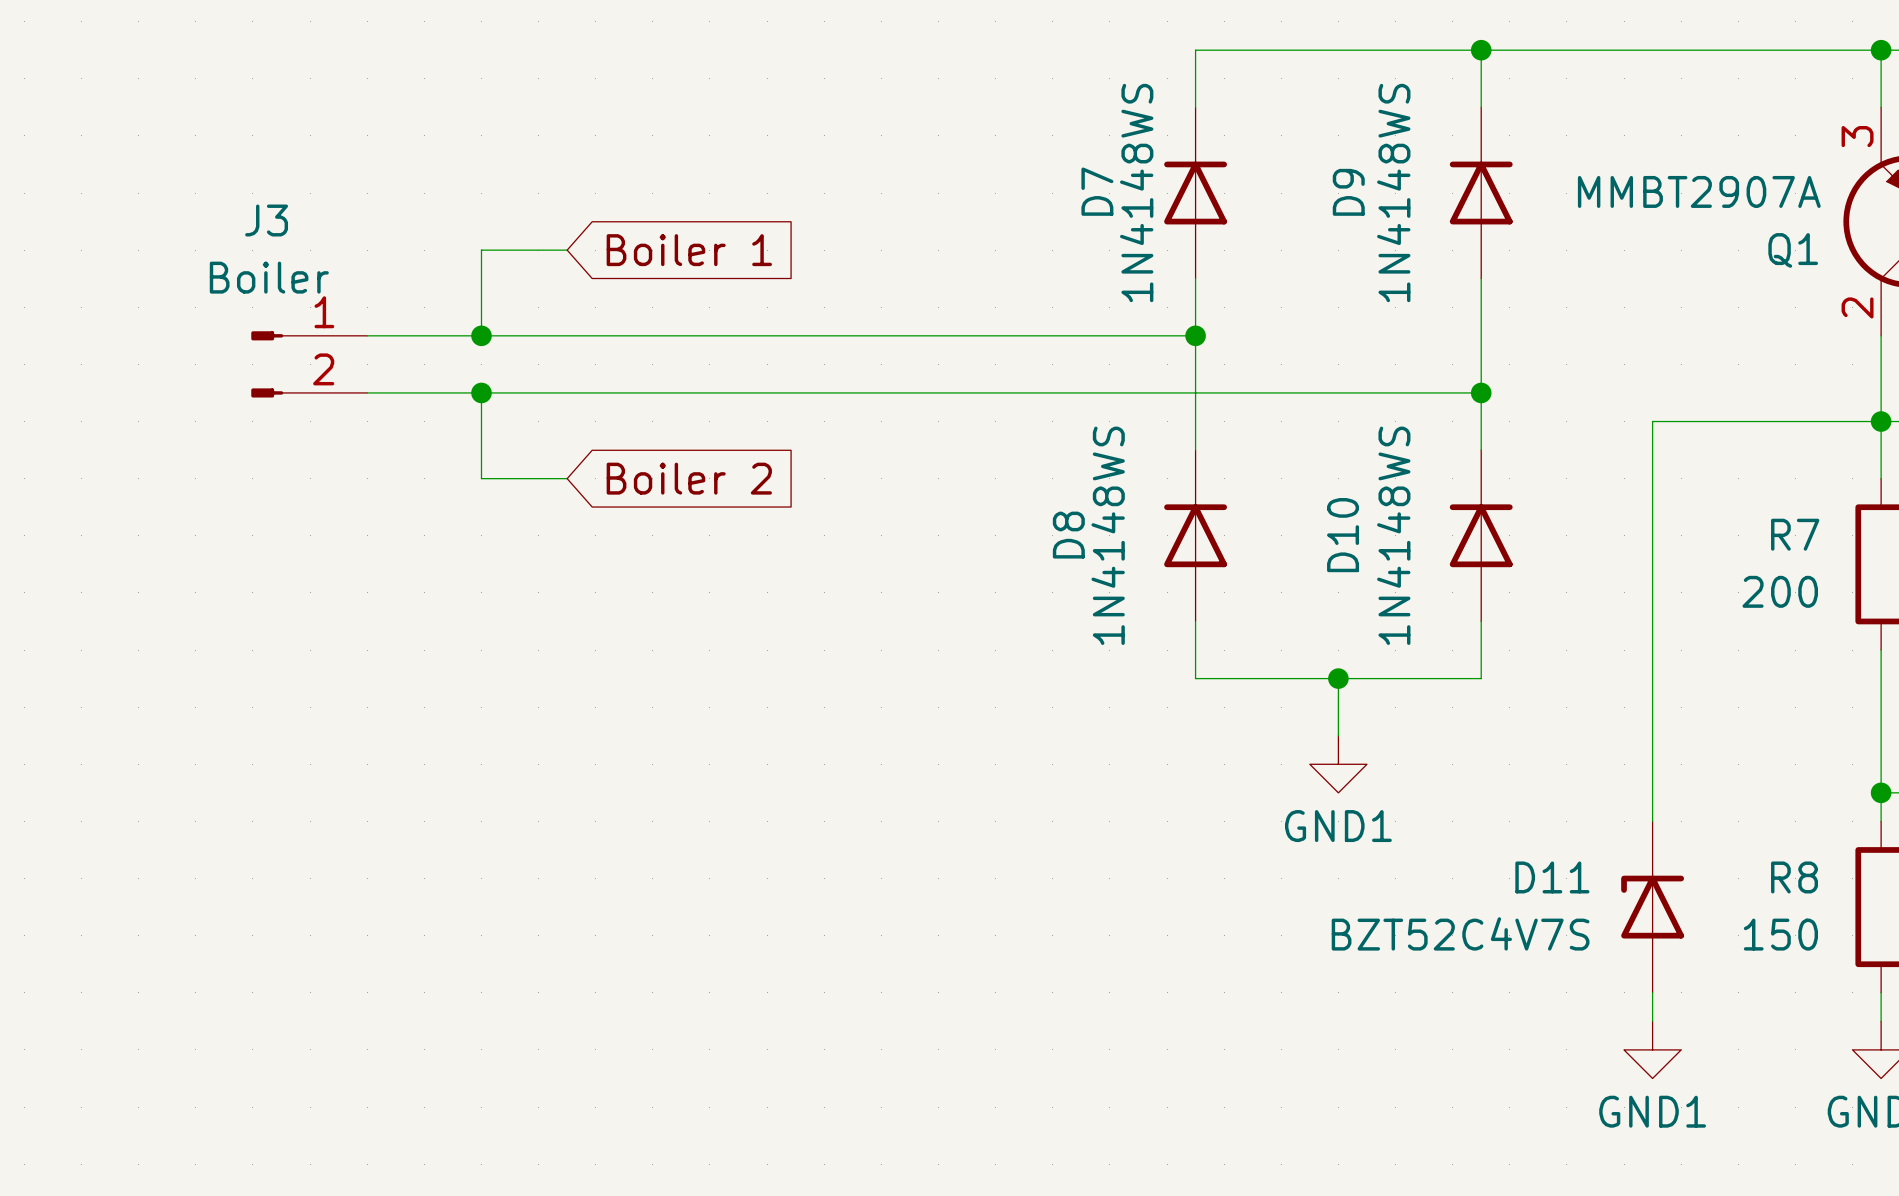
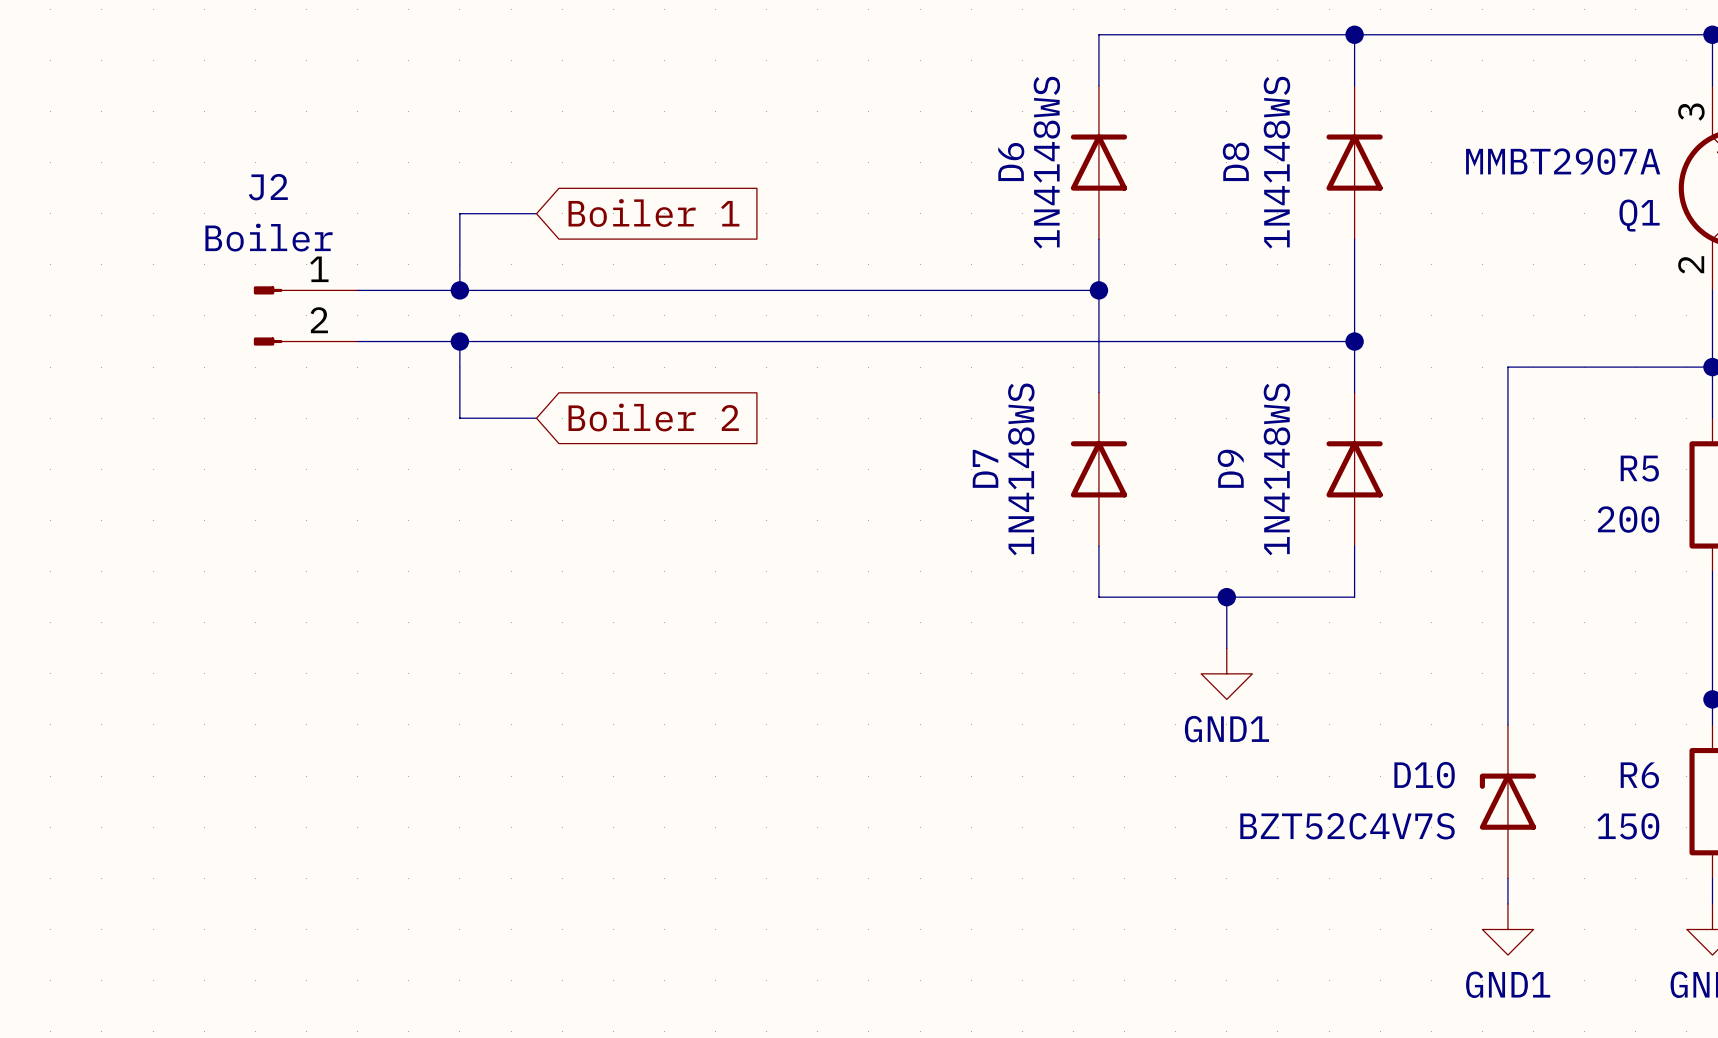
D7 name: D7 (1097, 191) -> D6 (1011, 162)
D9 name: D9 (1348, 192) -> D8 (1236, 161)
J3 name: J3 (266, 220) -> J2 (268, 187)
R7 name: R7 (1795, 534) -> R5 (1639, 468)
D8 name: D8 (1068, 535) -> D7 (985, 468)
D10 name: D10 (1343, 535) -> D9 (1230, 468)
D11 name: D11 (1552, 877) -> D10 (1424, 775)
R8 name: R8 (1794, 877) -> R6 (1639, 775)

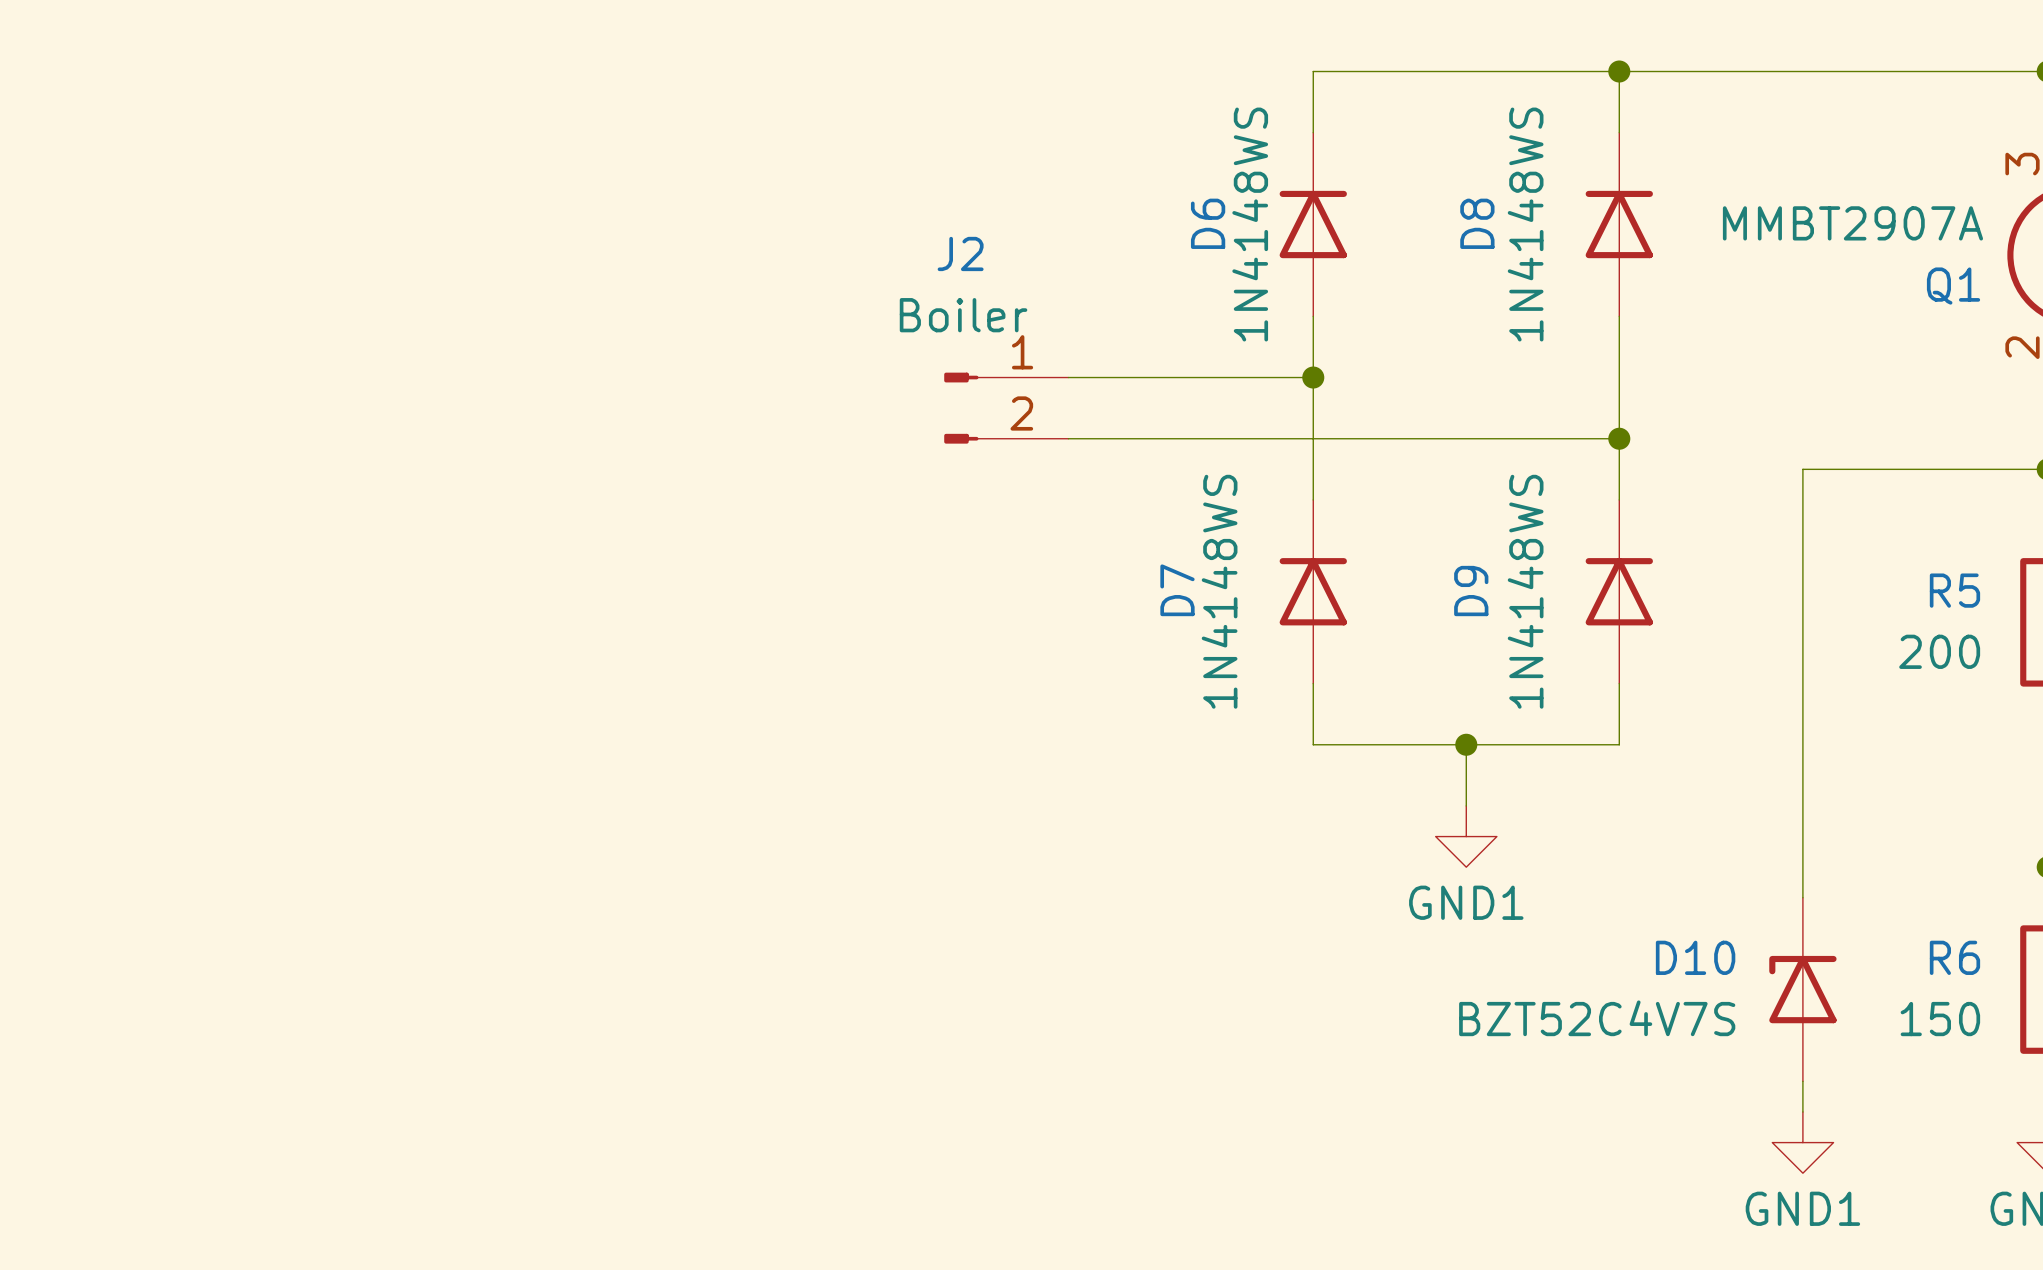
wire: (536, 213) (459, 213) (459, 290) -> none
global label: Boiler 1 (653, 213) -> none
wire: (357, 290) (894, 290) -> none
junction: (459, 290) -> none
J2 position: (305, 315) -> (1006, 408)
wire: (357, 341) (894, 341) -> none
wire: (459, 341) (459, 418) (536, 418) -> none
junction: (459, 341) -> none
global label: Boiler 2 (653, 417) -> none

